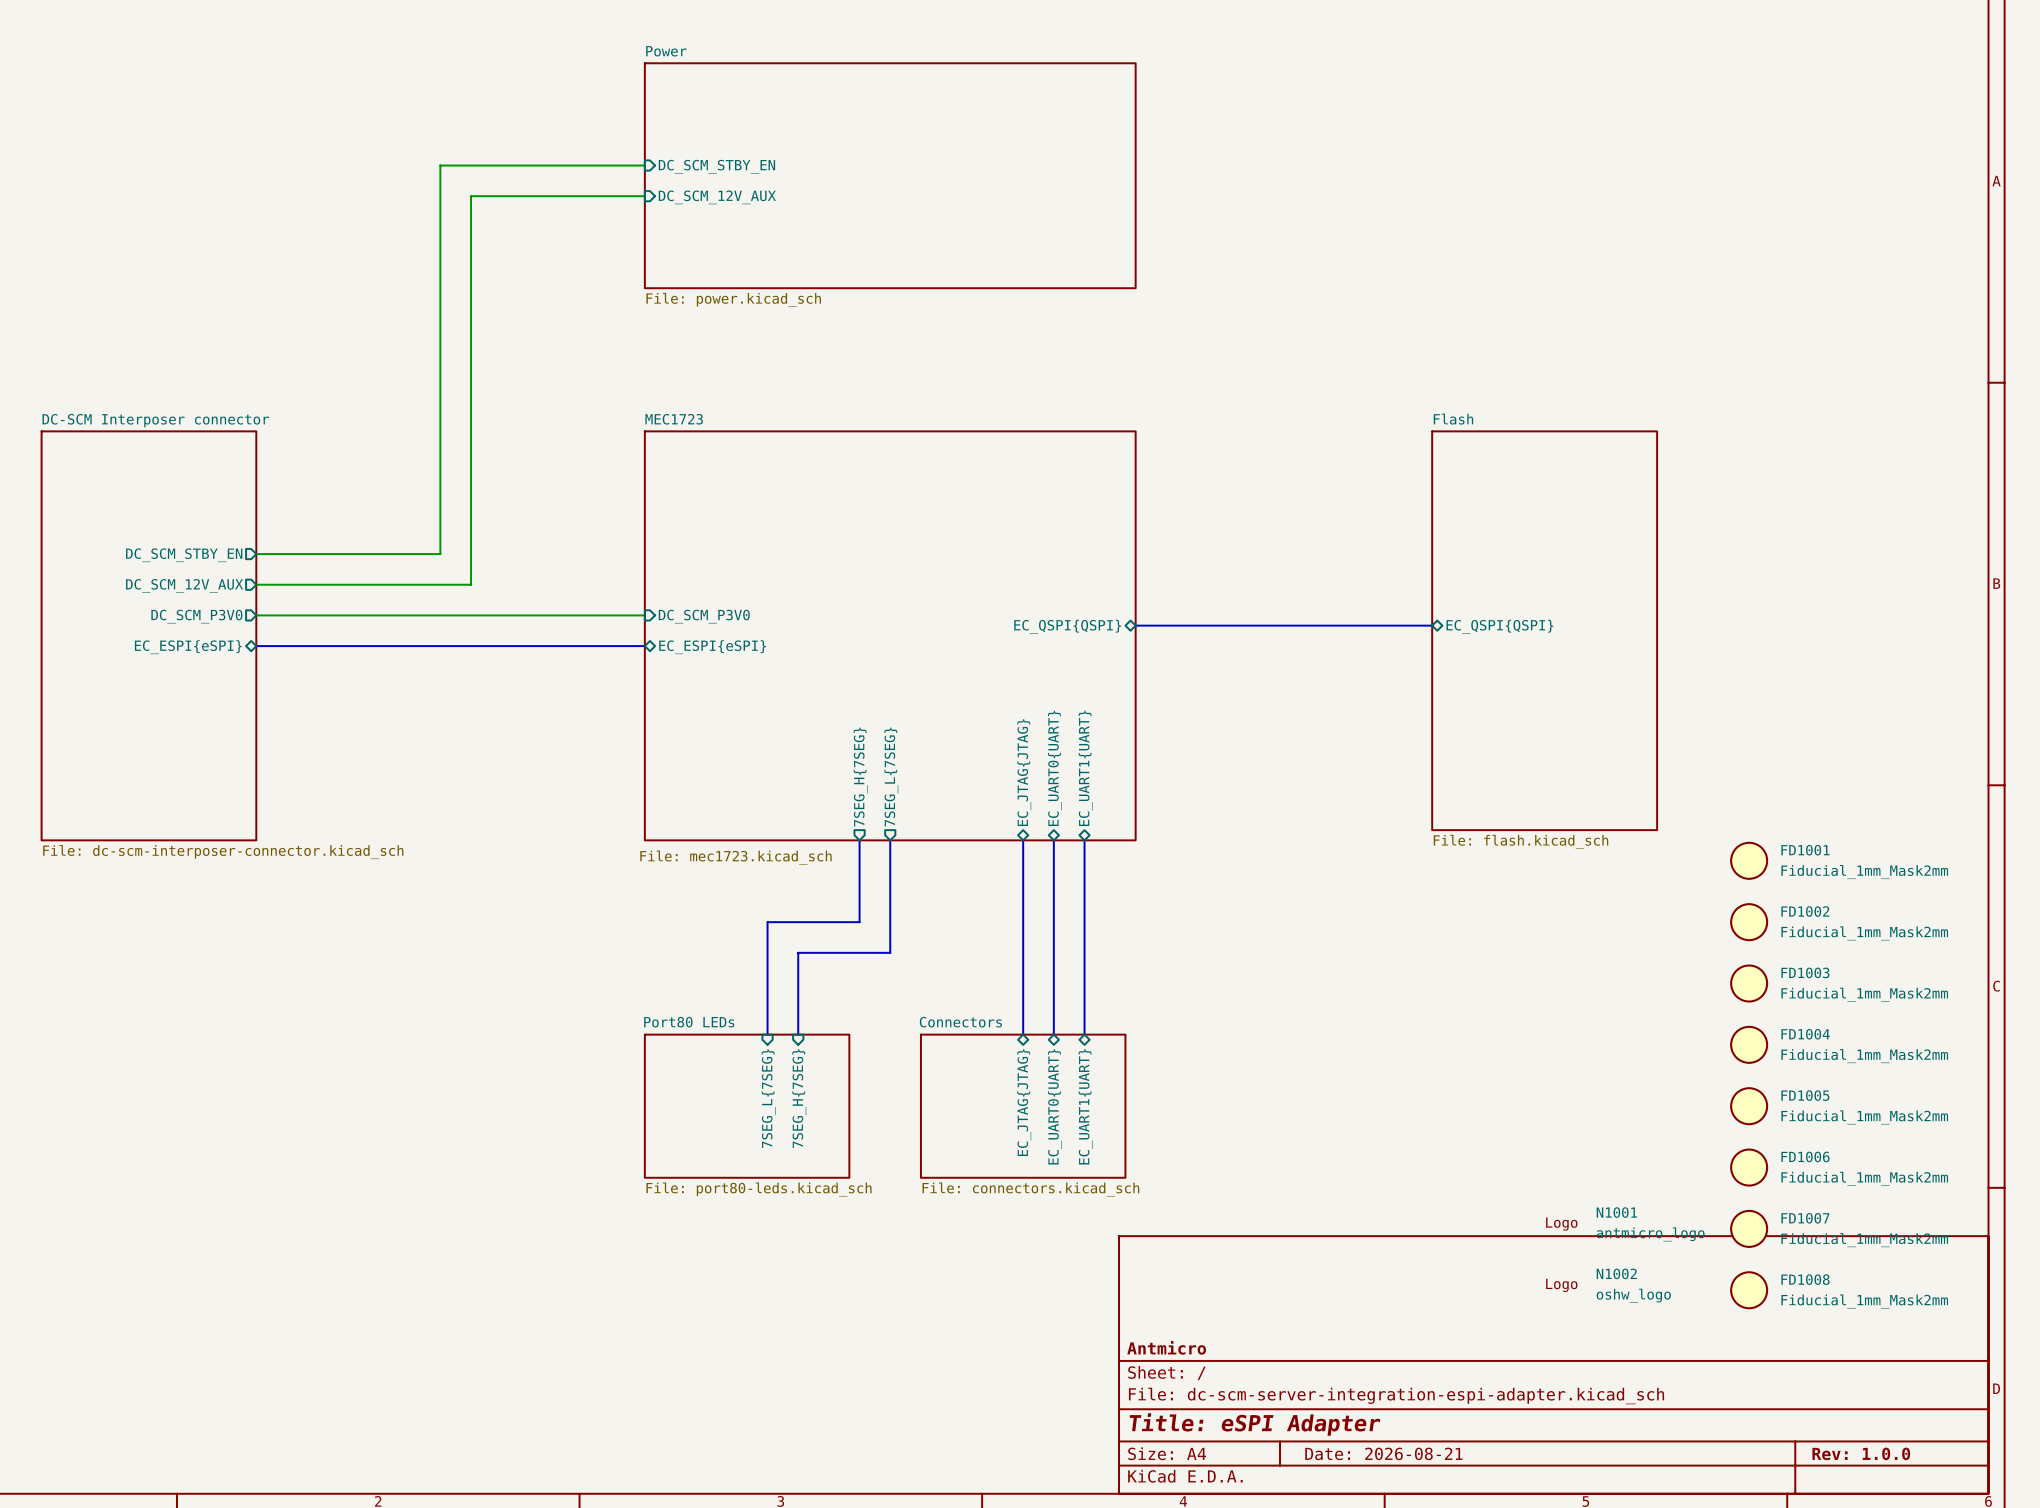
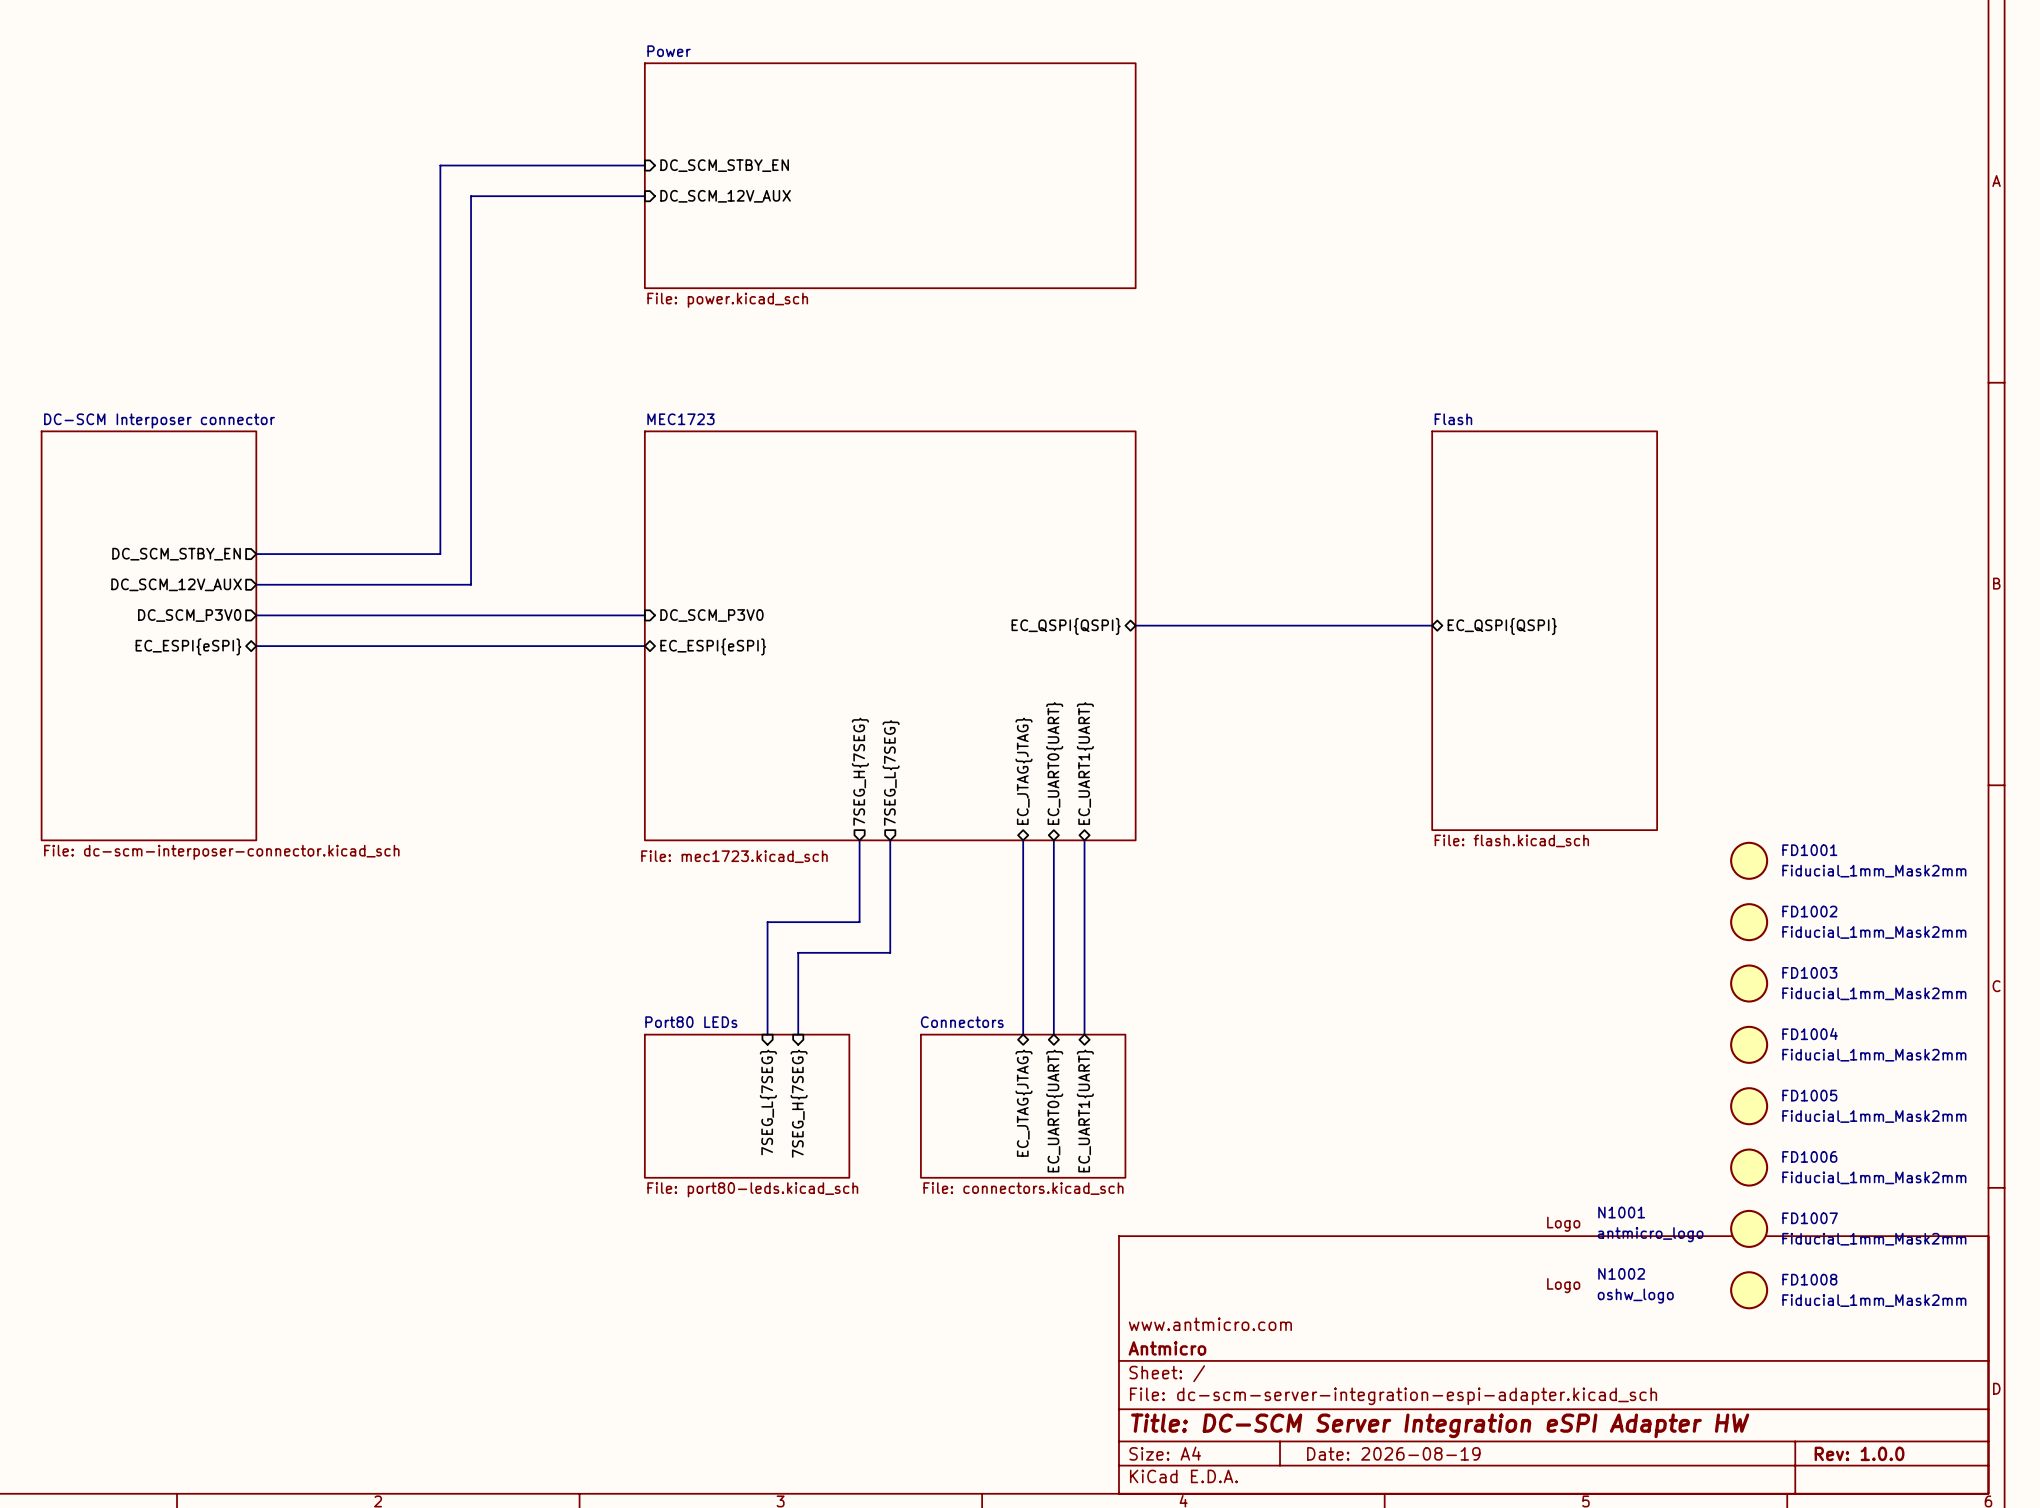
title block: none -> www.antmicro.com (1210, 1324)
title block: Title: eSPI Adapter (1254, 1424) -> Title: DC-SCM Server Integration eSPI Adapter HW (1440, 1425)
title block: Date: 2026-08-21 (1383, 1453) -> Date: 2026-08-19 (1393, 1453)

